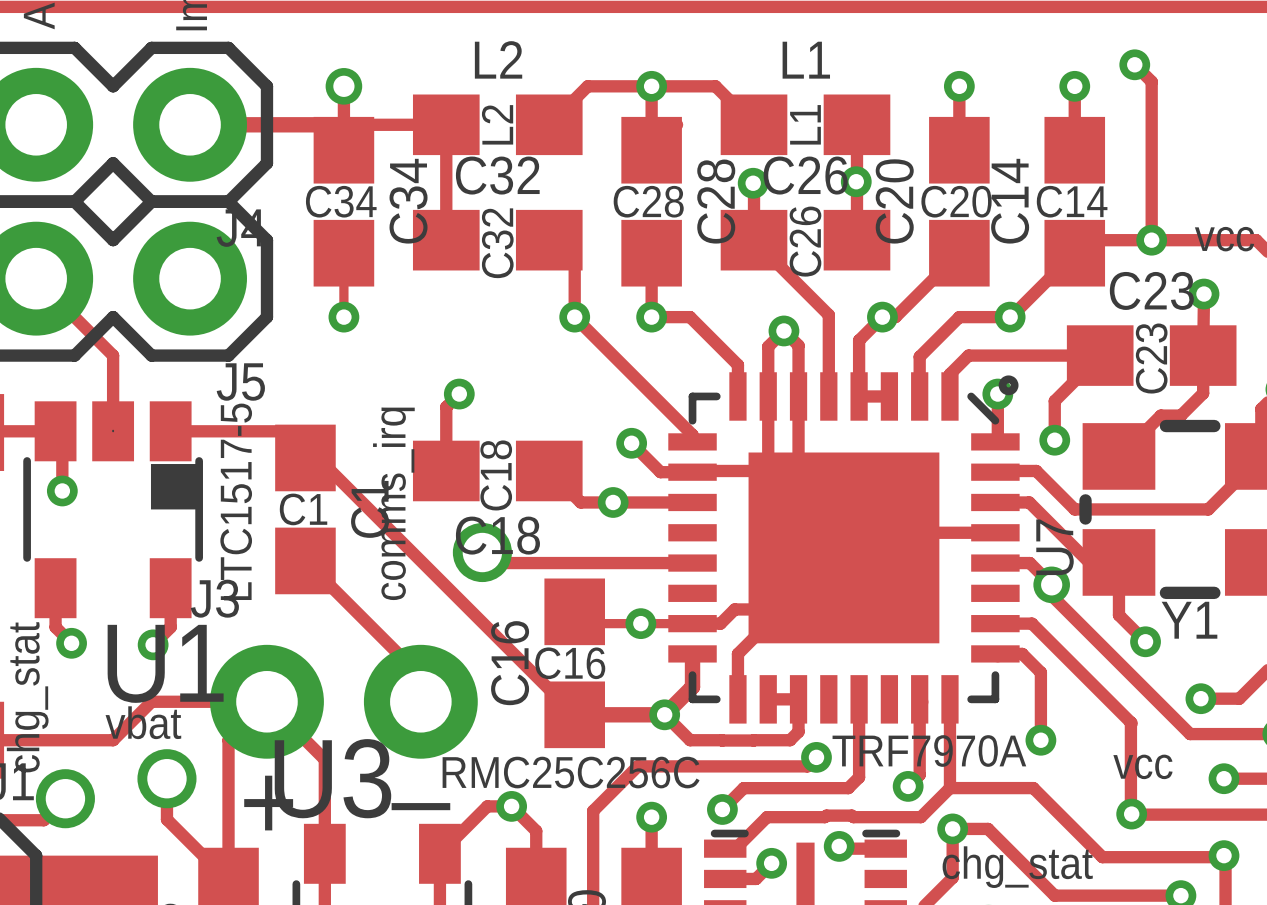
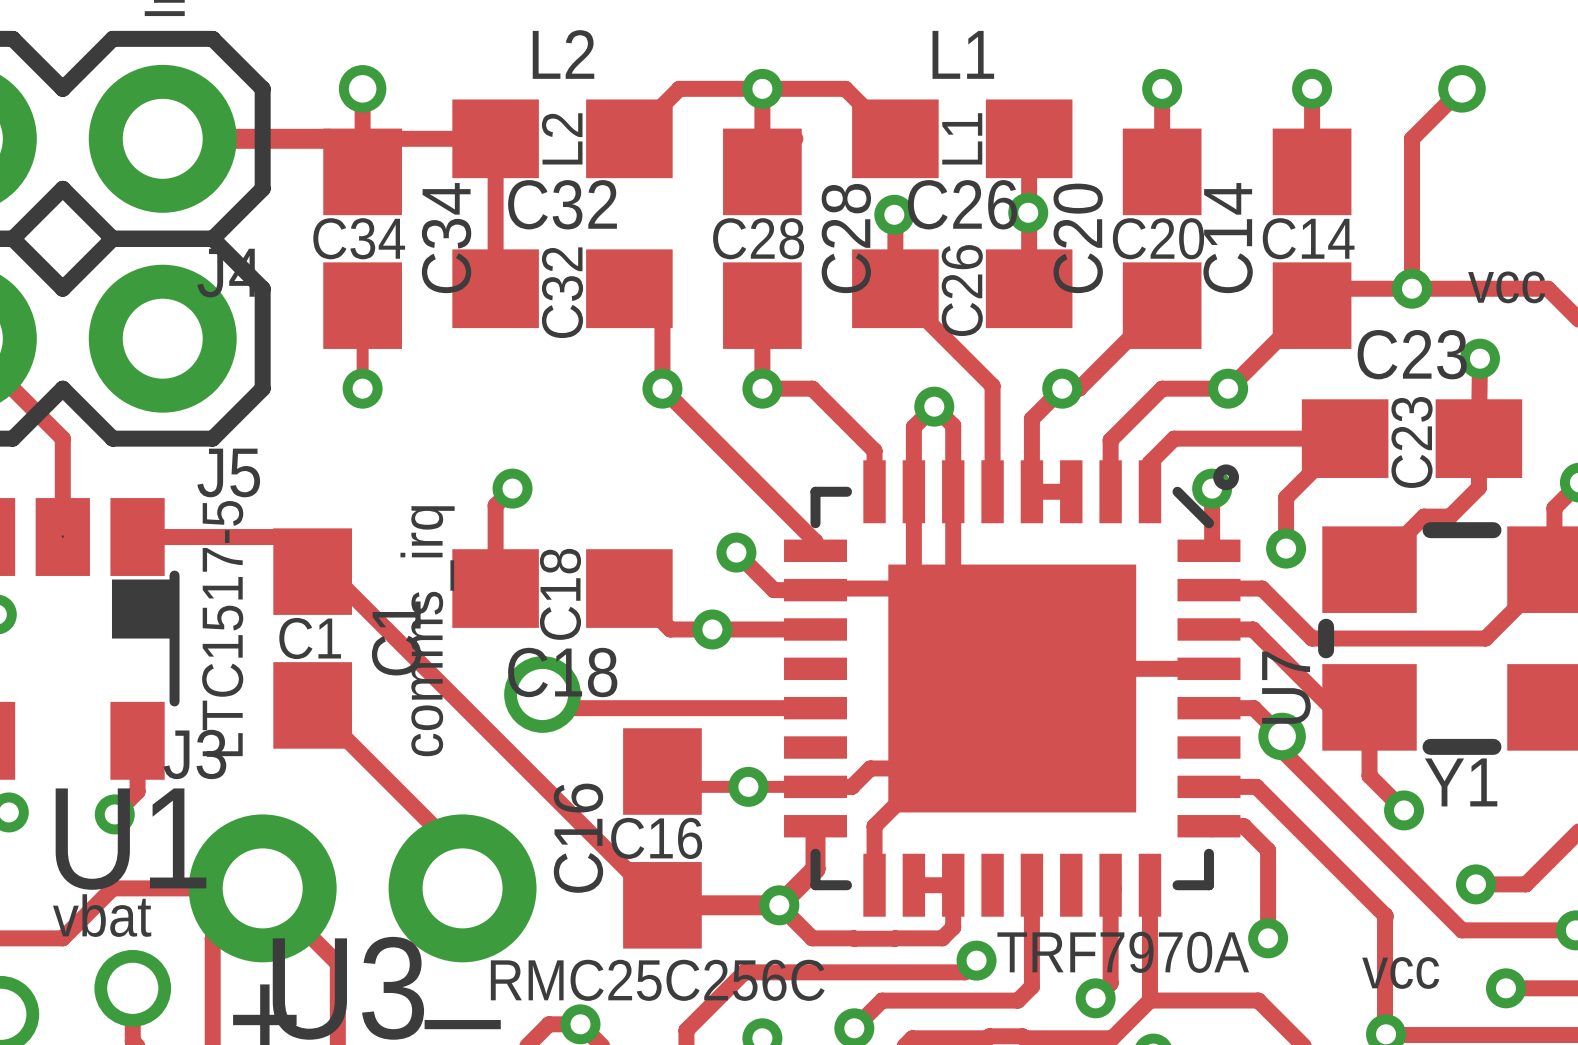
track: (1134, 64) (1151, 81) (1151, 124) -> (1461, 88) (1412, 138)
via: (1134, 64) -> none
via: none -> (1461, 88)

